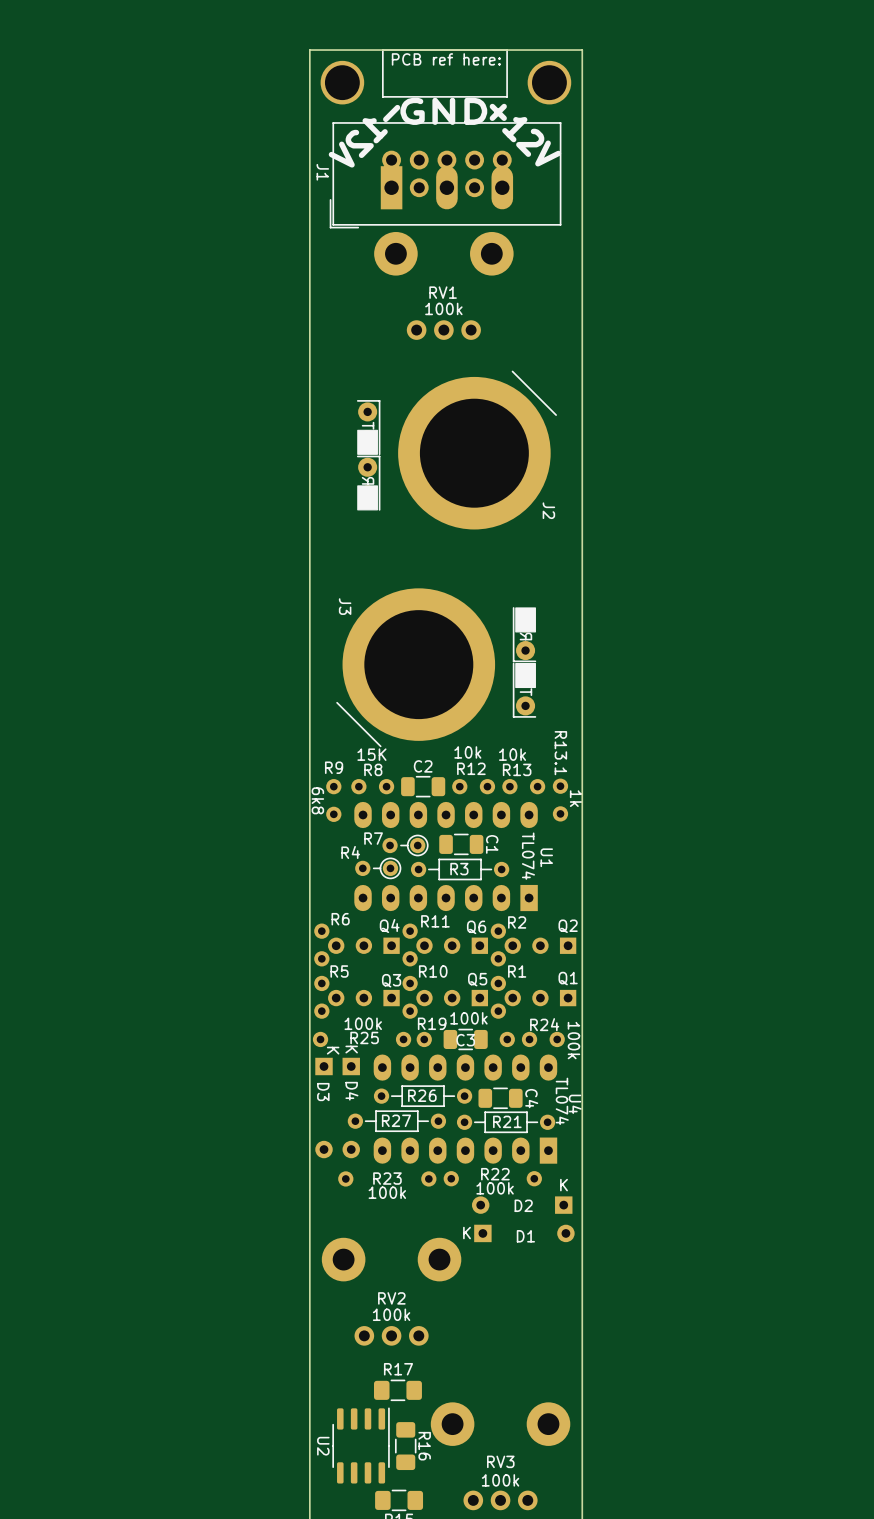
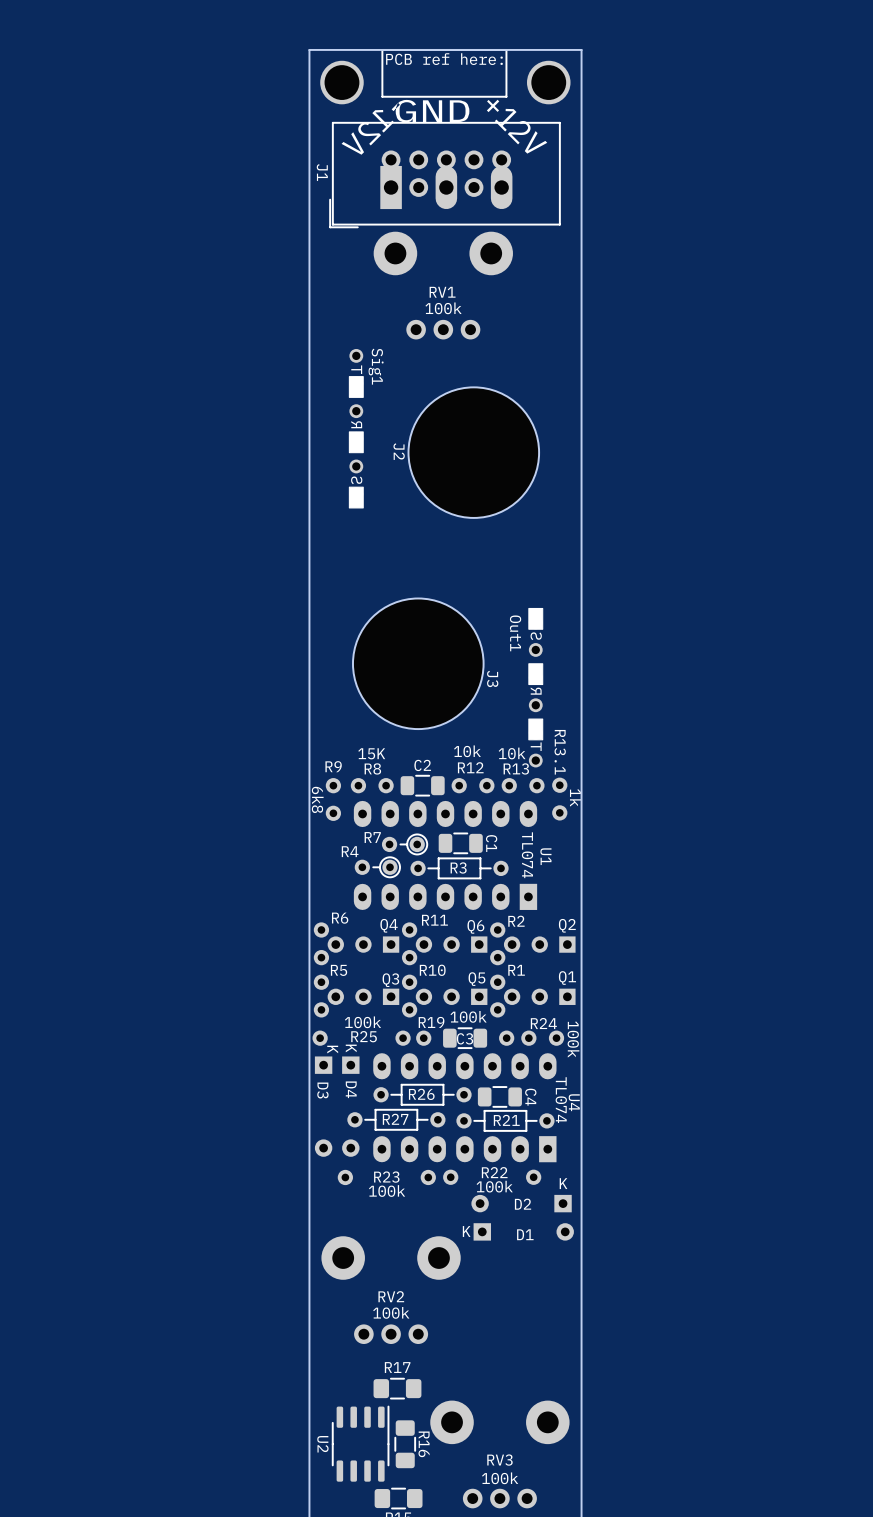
J2 value: none -> Sig1 (376, 366)
J2 footprint: [356, 370, 557, 530] -> [348, 348, 540, 518]
J2 name position: J2 (548, 510) -> J2 (399, 451)
J3 footprint: [336, 588, 537, 748] -> [352, 598, 544, 768]
J3 name position: J3 (345, 606) -> J3 (492, 678)
J3 value: none -> Out1 (515, 633)

